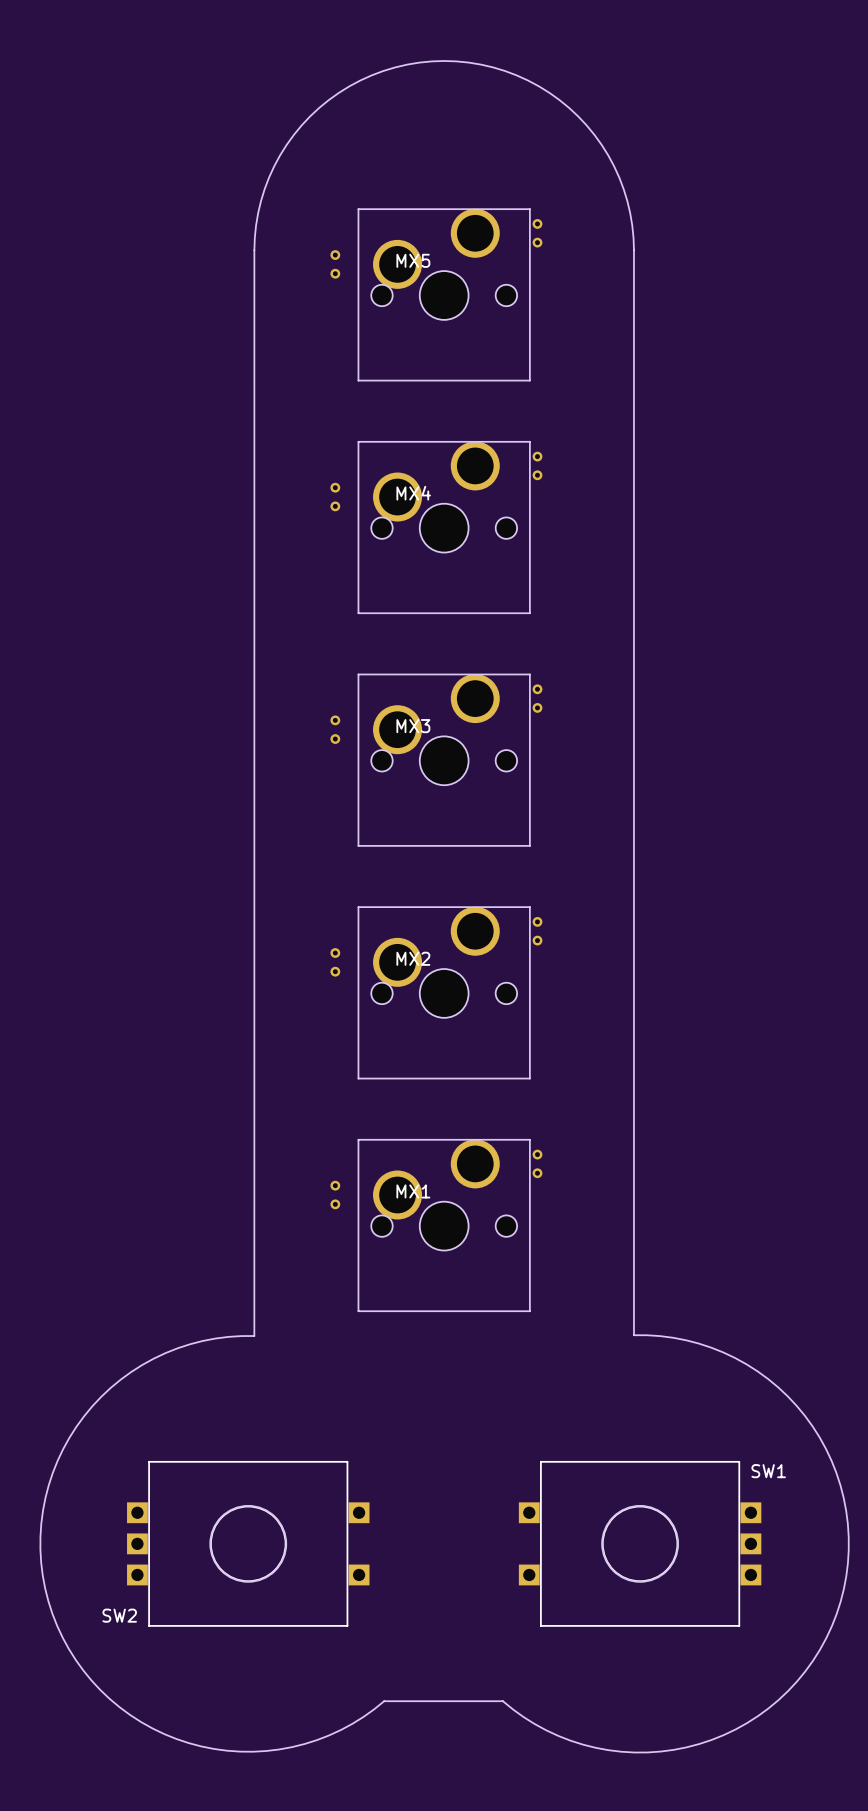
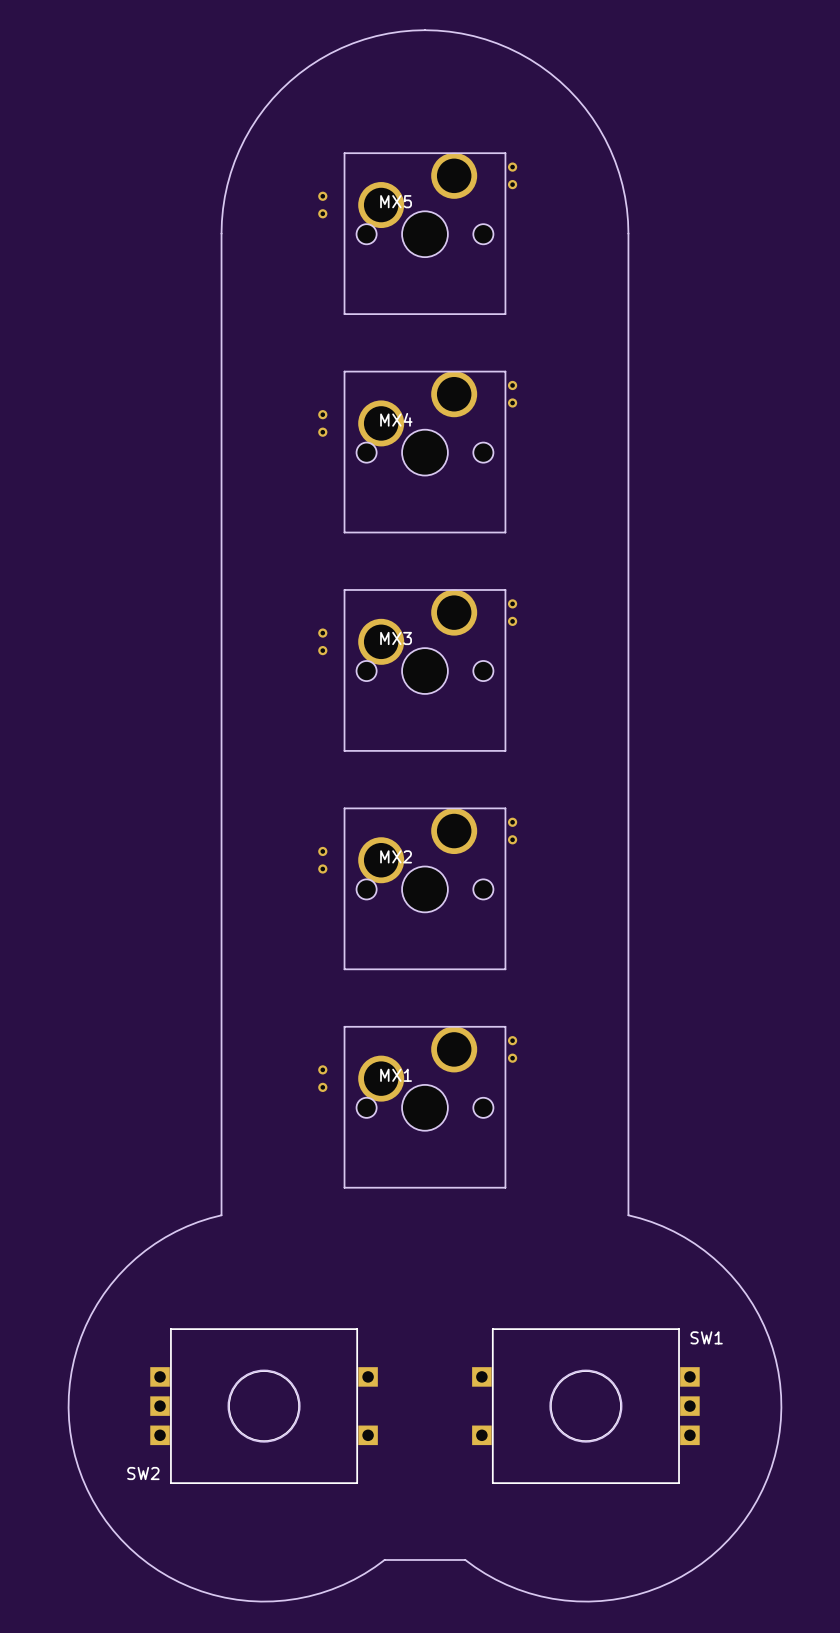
board edge: (254, 250) (254, 1336) (215, 1338) (190, 1344) (165, 1353) (142, 1364) (120, 1379) (101, 1396) (84, 1416) (63, 1449) (52, 1473) (45, 1498) (41, 1523) (40, 1549) (42, 1575) (48, 1601) (57, 1625) (68, 1648) (91, 1680) (109, 1699) (130, 1715) (152, 1728) (176, 1739) (201, 1746) (227, 1750) (253, 1751) (279, 1749) (304, 1744) (329, 1735) (352, 1723) (384, 1701) (502, 1701) (523, 1717) (558, 1735) (582, 1744) (608, 1750) (647, 1752) (673, 1749) (699, 1744) (735, 1729) (757, 1716) (778, 1700) (805, 1671) (826, 1638) (840, 1601) (847, 1563) (848, 1537) (843, 1498) (831, 1460) (819, 1437) (805, 1415) (778, 1387) (746, 1364) (711, 1347) (673, 1337) (633, 1335) (633, 250) (632, 225) (627, 201) (614, 166) (601, 145) (578, 116) (549, 92) (516, 75) (481, 64) (444, 60) (419, 62) (383, 71) (349, 86) (319, 107) (301, 125) (280, 155) (264, 189) (256, 225) (254, 237) (254, 250) -> (424, 30) (388, 33) (364, 39) (330, 53) (299, 73) (281, 89) (257, 118) (239, 150) (227, 184) (221, 233) (221, 1215) (187, 1226) (165, 1237) (136, 1258) (118, 1275) (97, 1304) (85, 1325) (74, 1359) (69, 1383) (69, 1419) (74, 1455) (87, 1489) (105, 1520) (129, 1548) (158, 1570) (201, 1591) (236, 1599) (273, 1601) (308, 1596) (354, 1579) (384, 1559) (465, 1559) (506, 1584) (529, 1593) (564, 1600) (613, 1599) (648, 1591) (681, 1576) (701, 1563) (736, 1530) (750, 1510) (767, 1478) (779, 1431) (781, 1395) (775, 1359) (764, 1325) (746, 1294) (722, 1266) (694, 1243) (662, 1226) (628, 1215) (628, 233) (622, 184) (610, 150) (599, 128) (577, 98) (550, 73) (530, 59) (497, 43) (461, 33) (424, 30)
SW2 position: (248, 1543) -> (264, 1406)
round board edge position: (248, 1543) -> (264, 1406)
SW1 position: (640, 1543) -> (585, 1406)
round board edge position: (640, 1543) -> (585, 1406)

